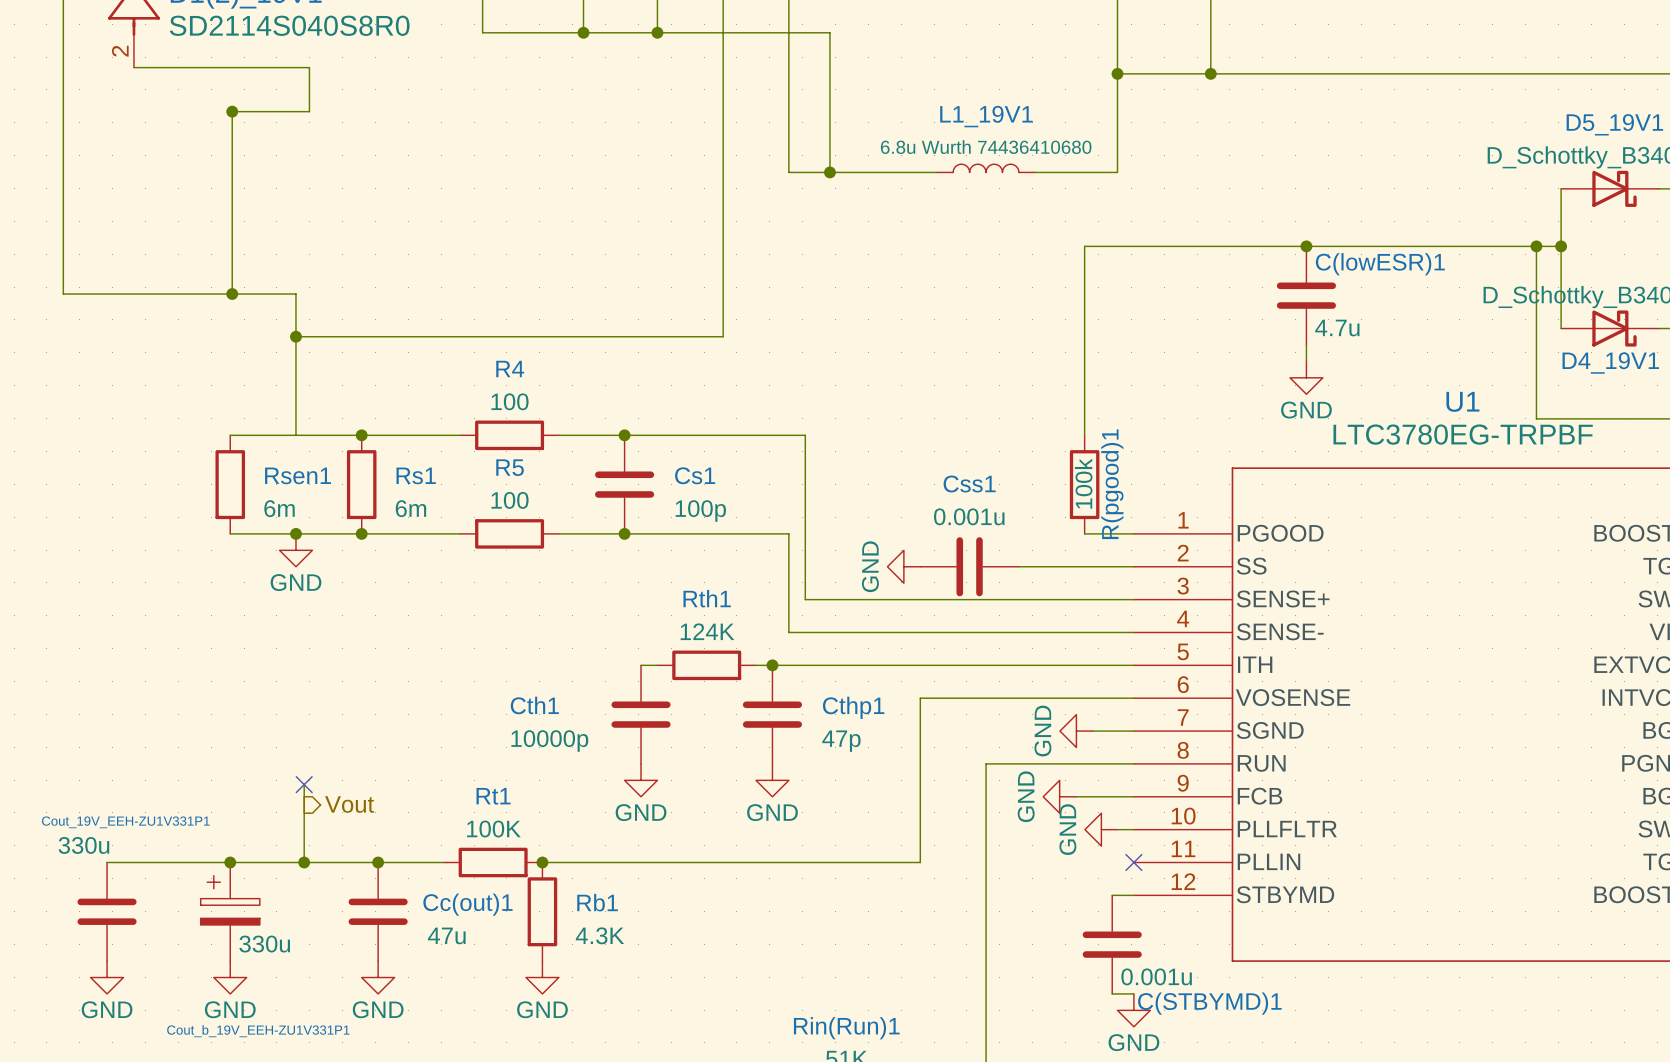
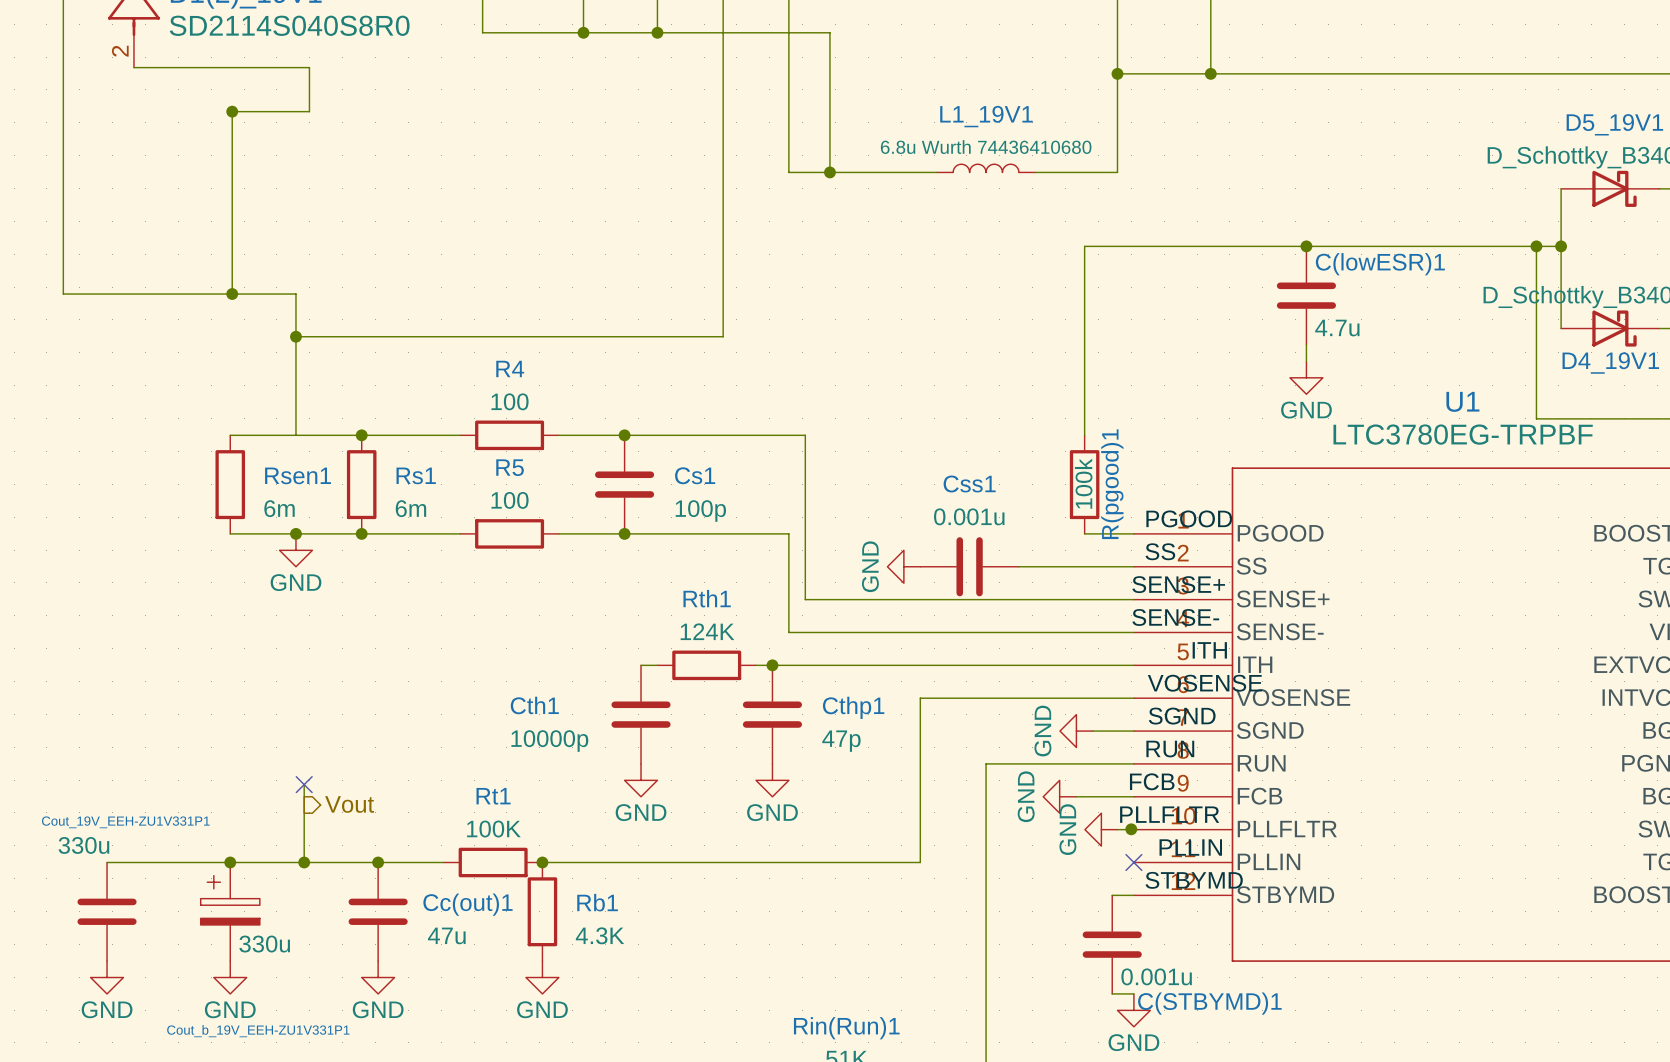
label: none -> PGOOD (1189, 518)
label: none -> SS (1160, 551)
label: none -> SENSE+ (1178, 584)
label: none -> SENSE- (1175, 617)
label: none -> ITH (1209, 650)
label: none -> VOSENSE (1204, 683)
label: none -> SGND (1182, 716)
label: none -> RUN (1170, 749)
label: none -> FCB (1152, 781)
label: none -> PLLFLTR (1169, 814)
junction: none -> (1131, 829)
label: none -> PLLIN (1190, 847)
label: none -> STBYMD (1194, 880)

